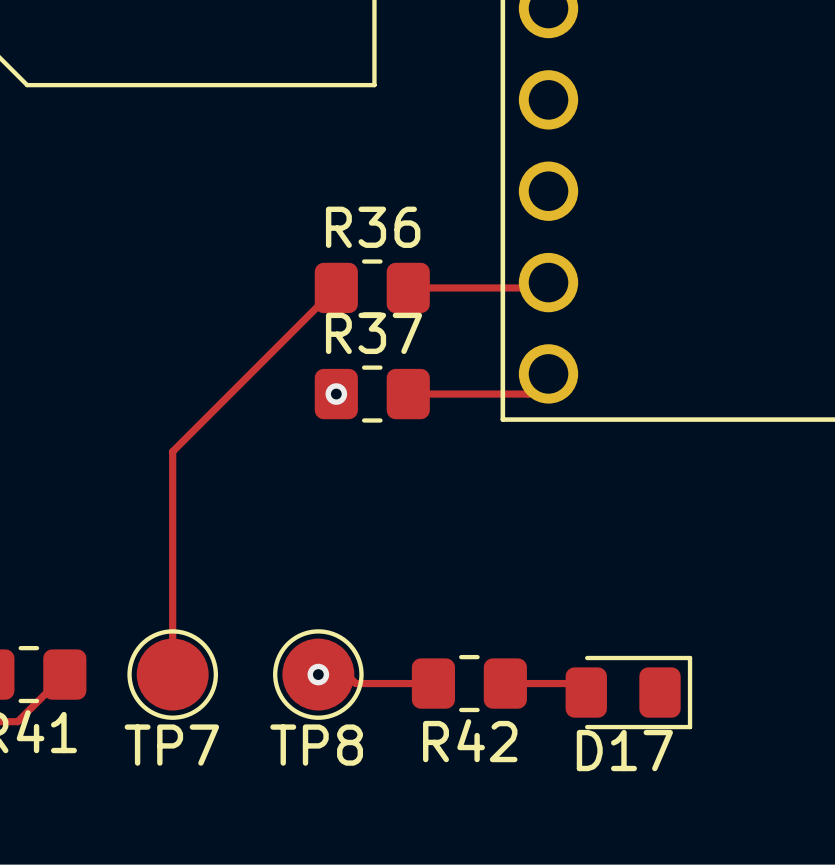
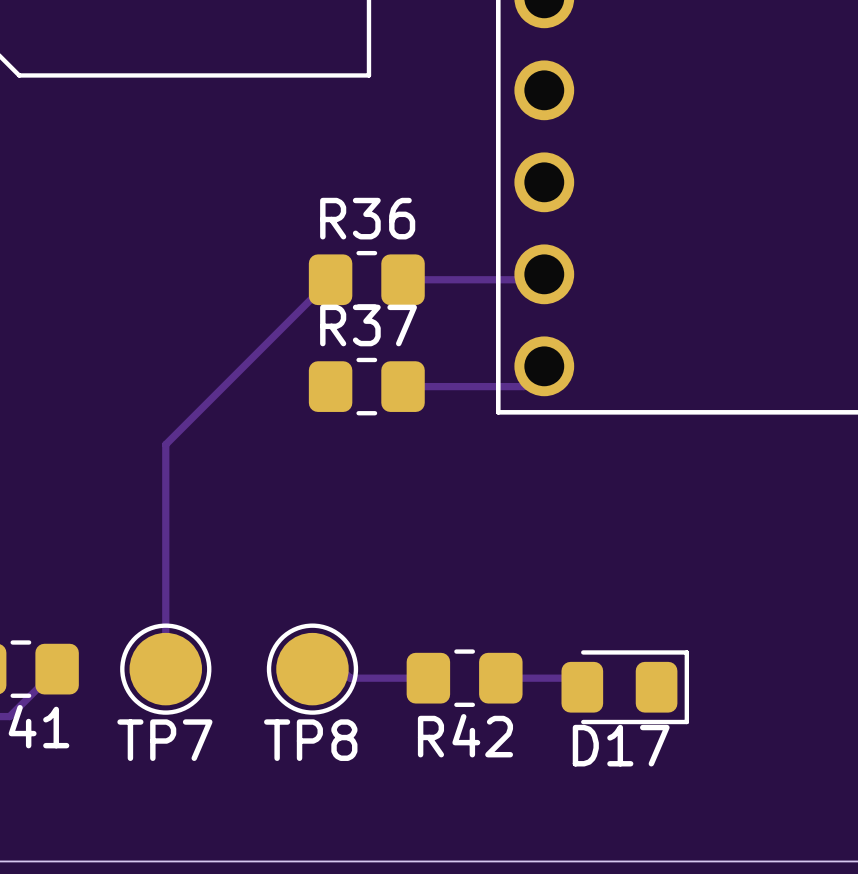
via: (336, 394) -> none
via: (318, 674) -> none

